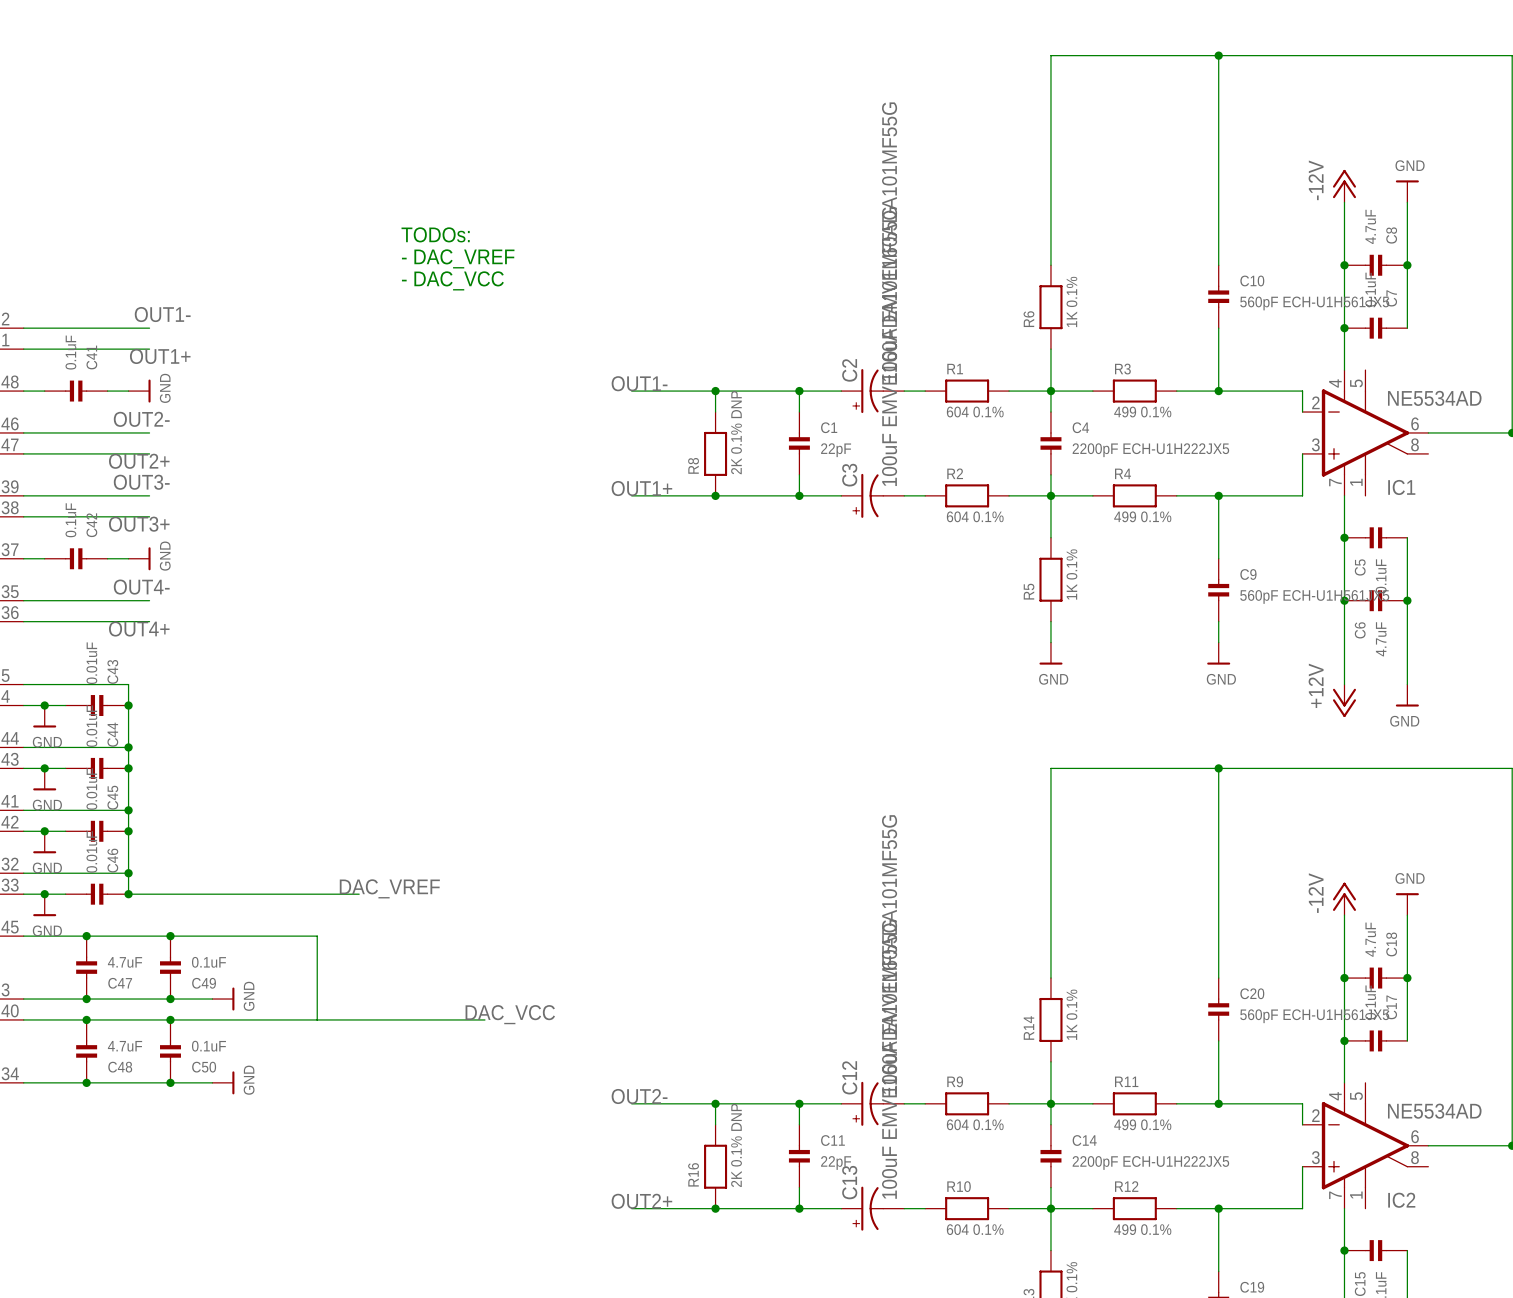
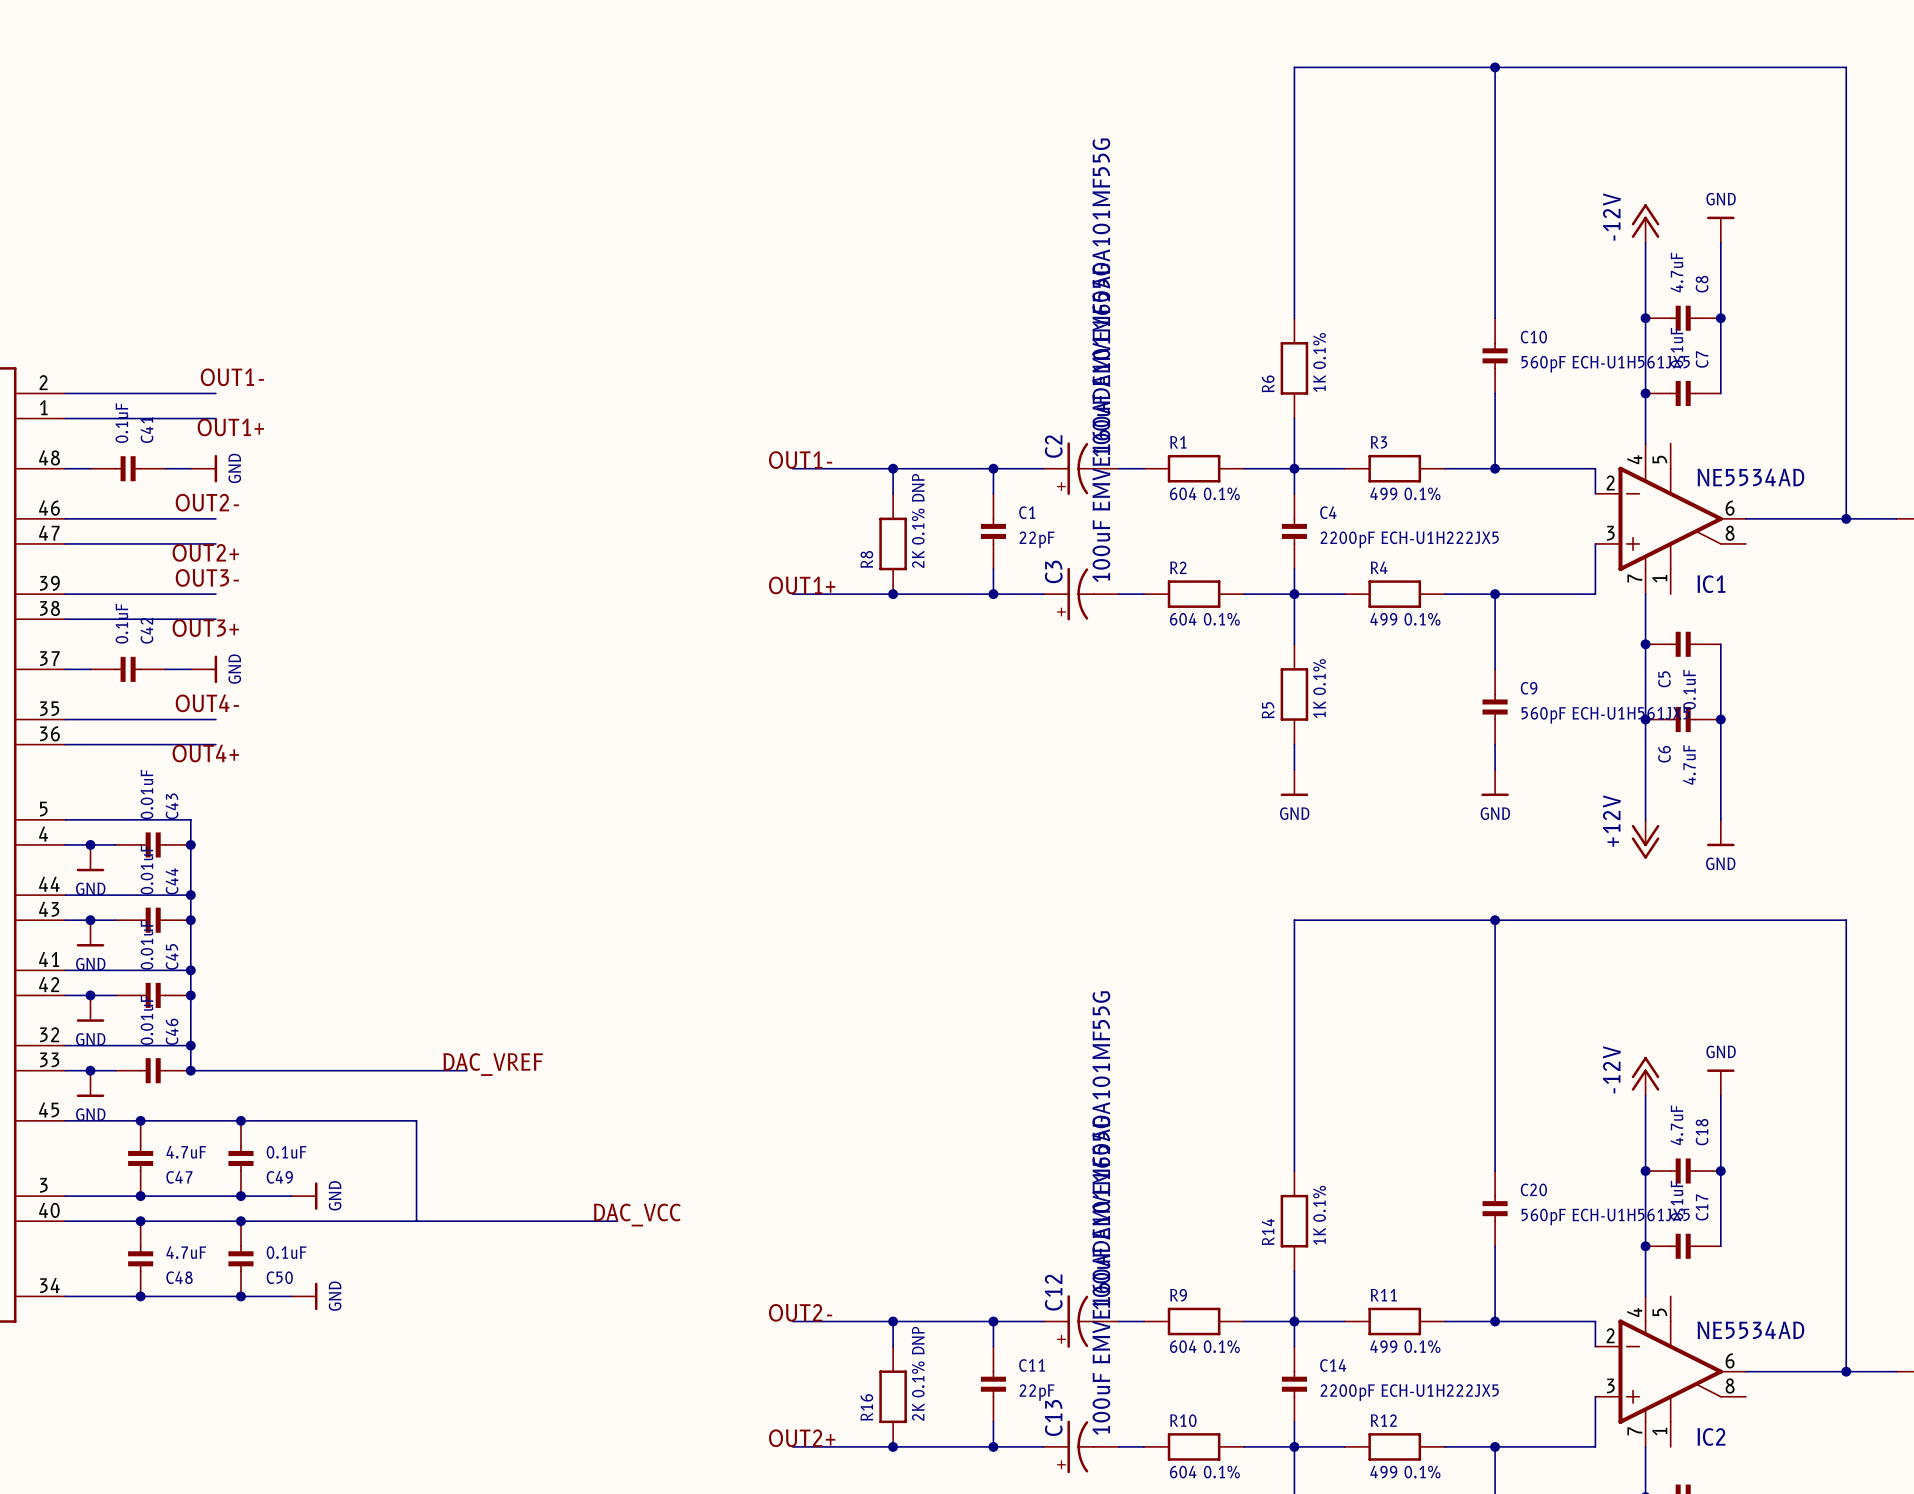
text: TODOs: (435, 234) -> none
text: - DAC_VREF (458, 258) -> none
text: - DAC_VCC (452, 280) -> none

